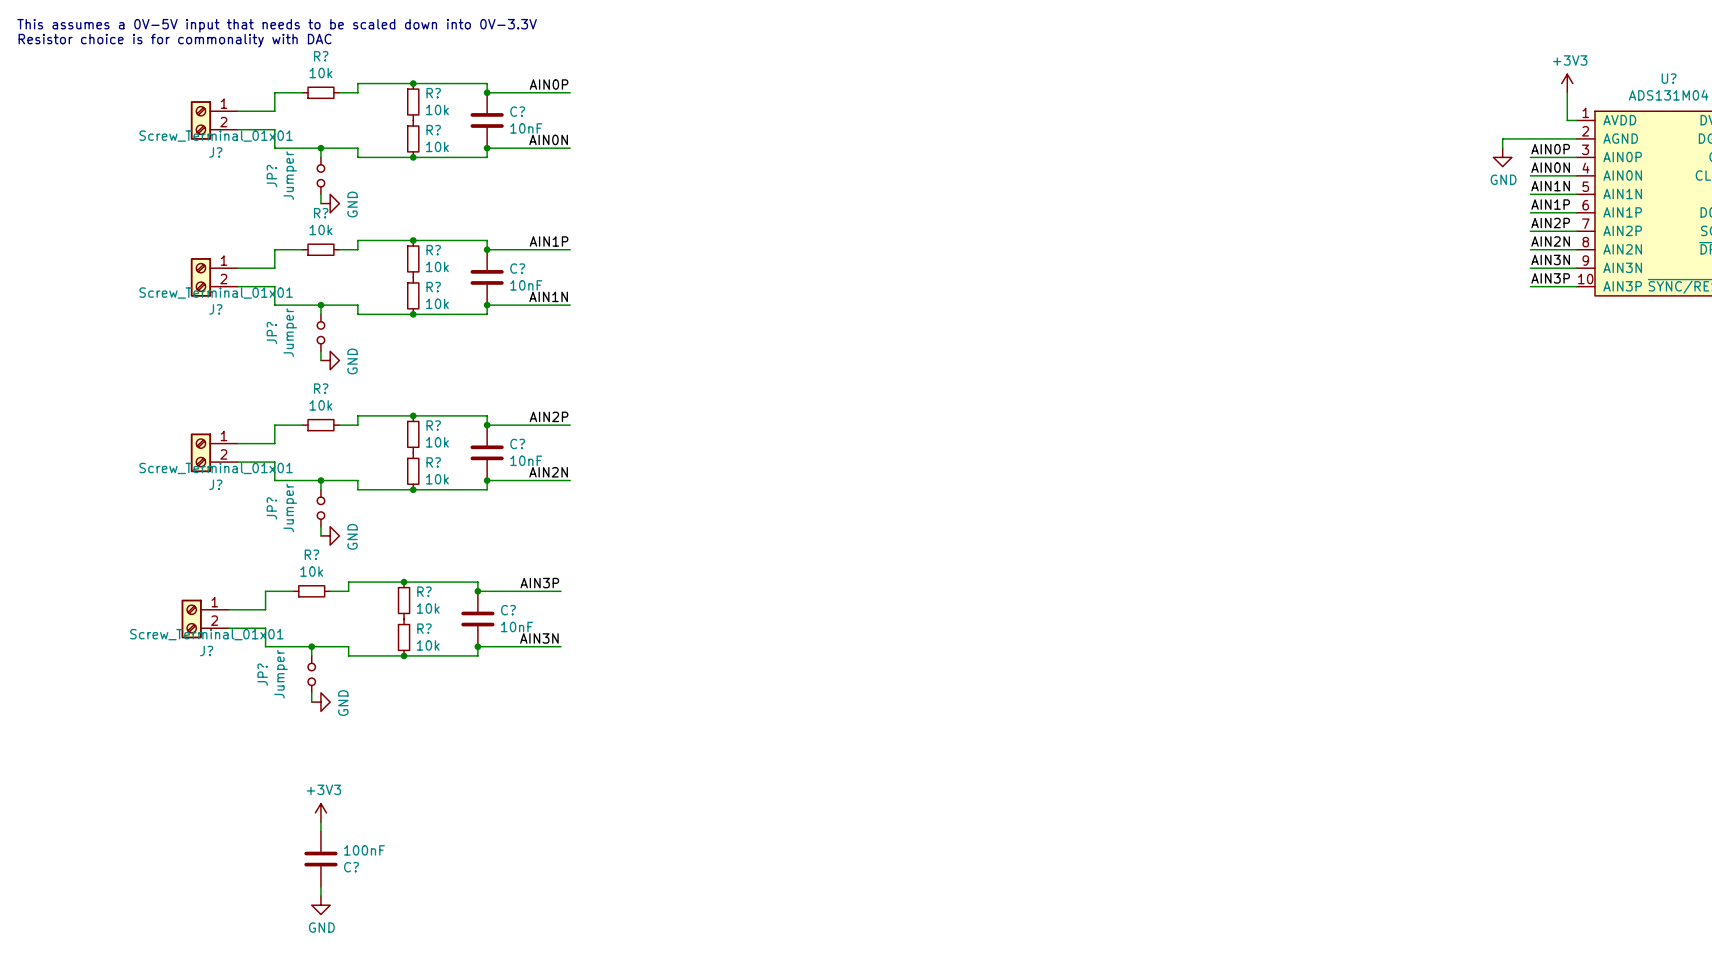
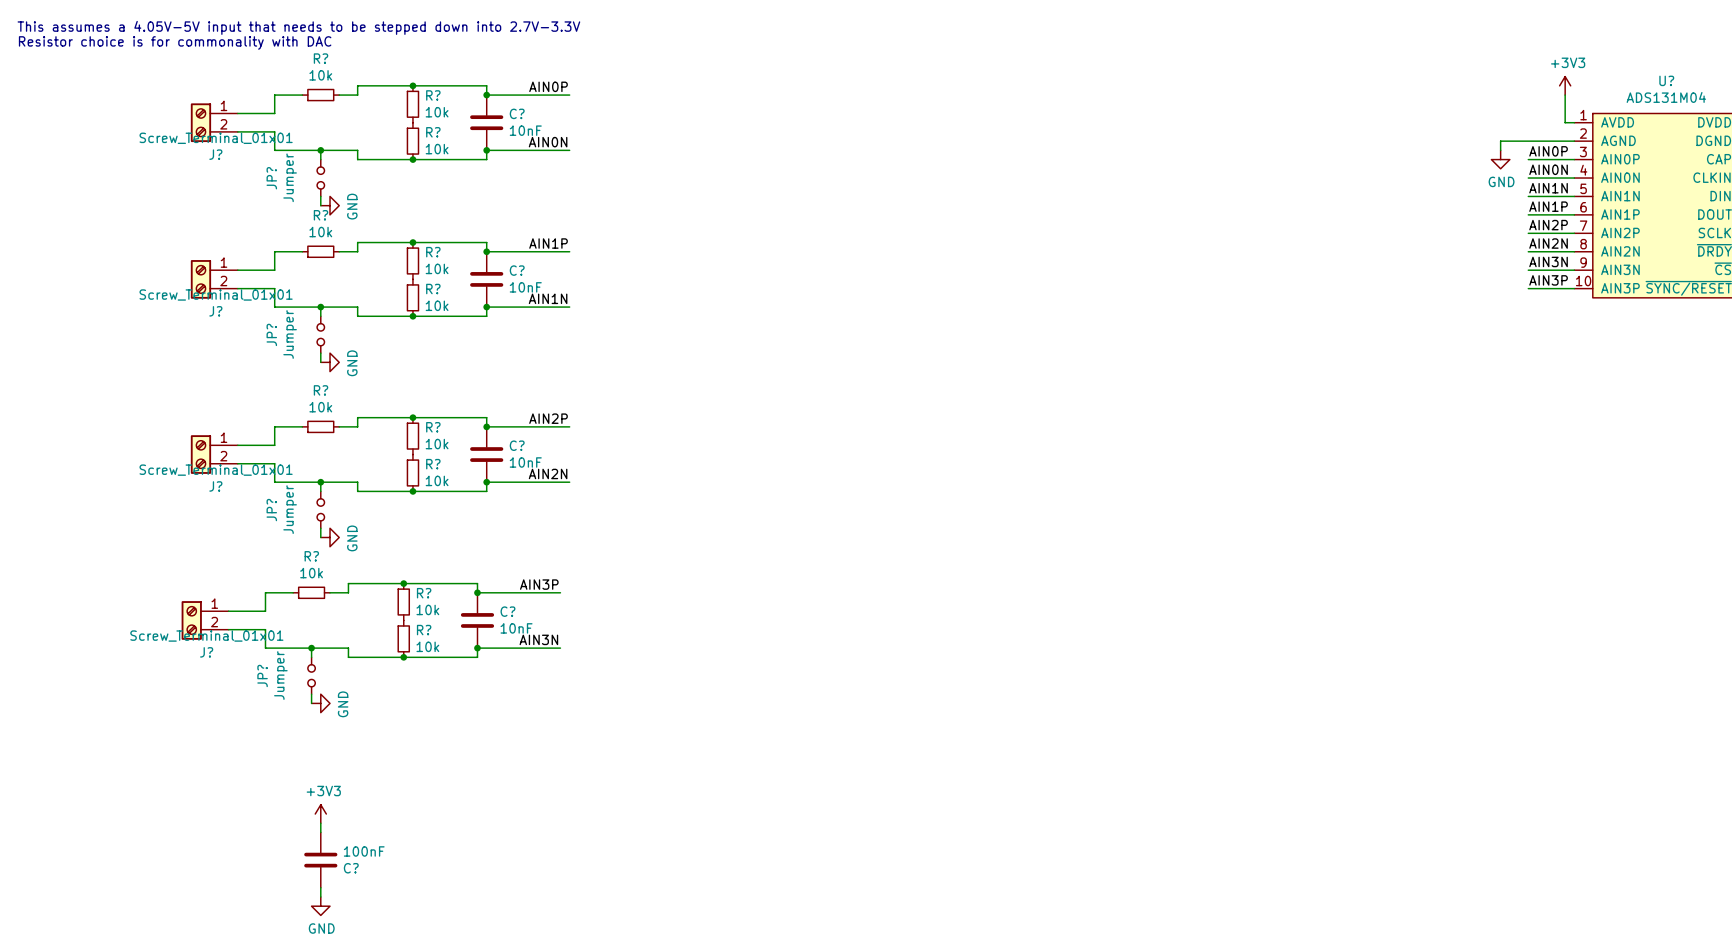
text: This assumes a 0V-5V input that needs to be scaled down into 0V-3.3V (277, 25) -> This assumes a 4.05V-5V input that needs to be stepped down into 2.7V-3.3V (298, 27)

